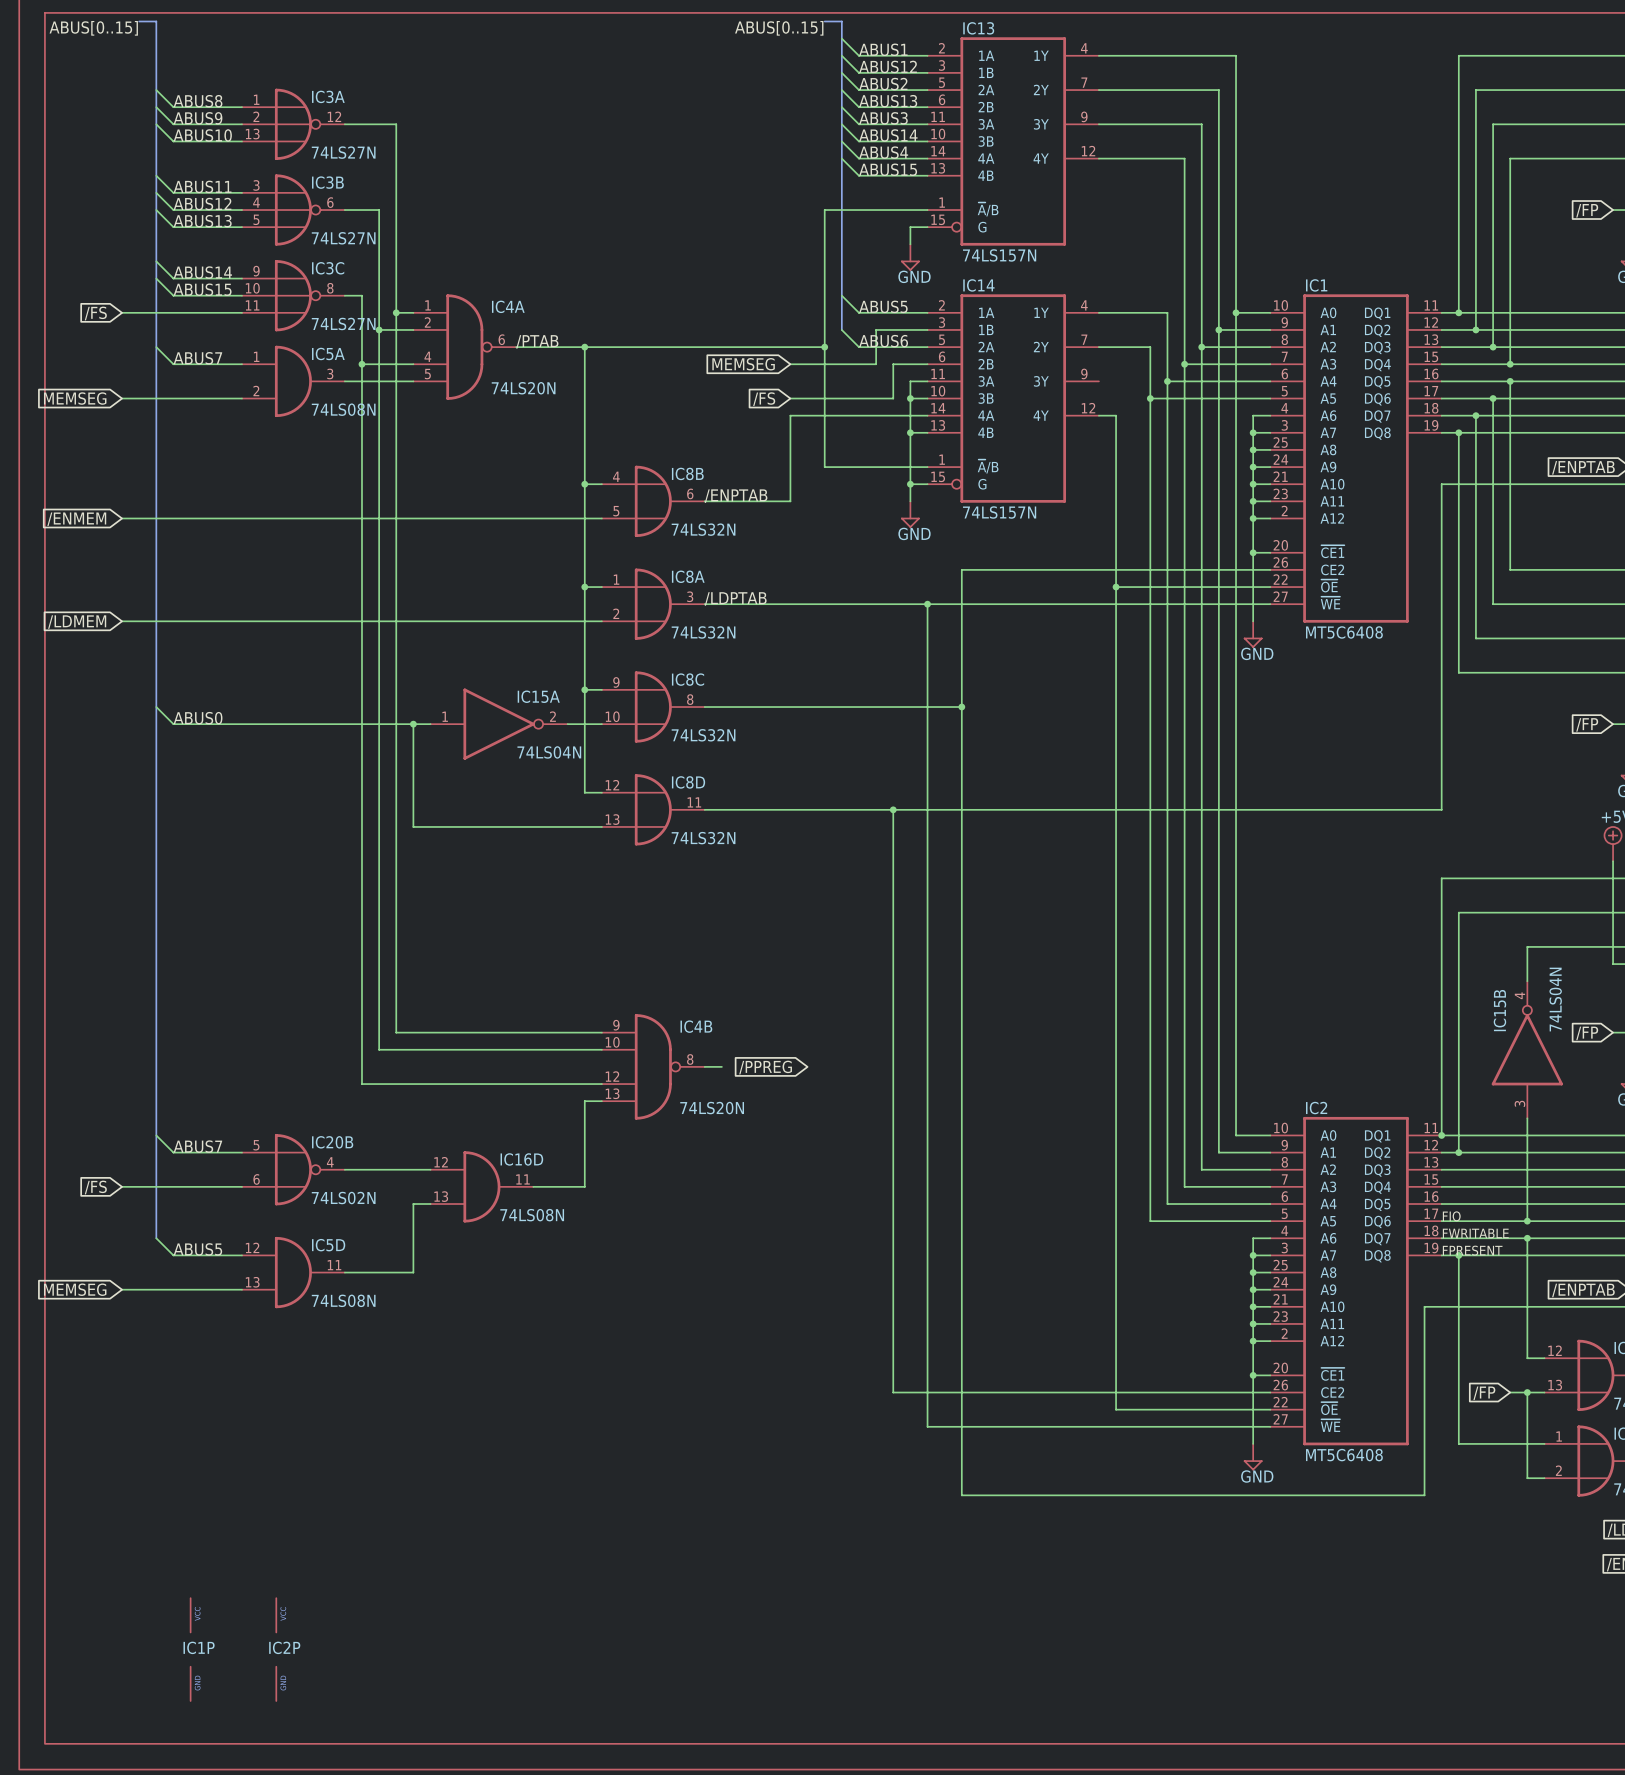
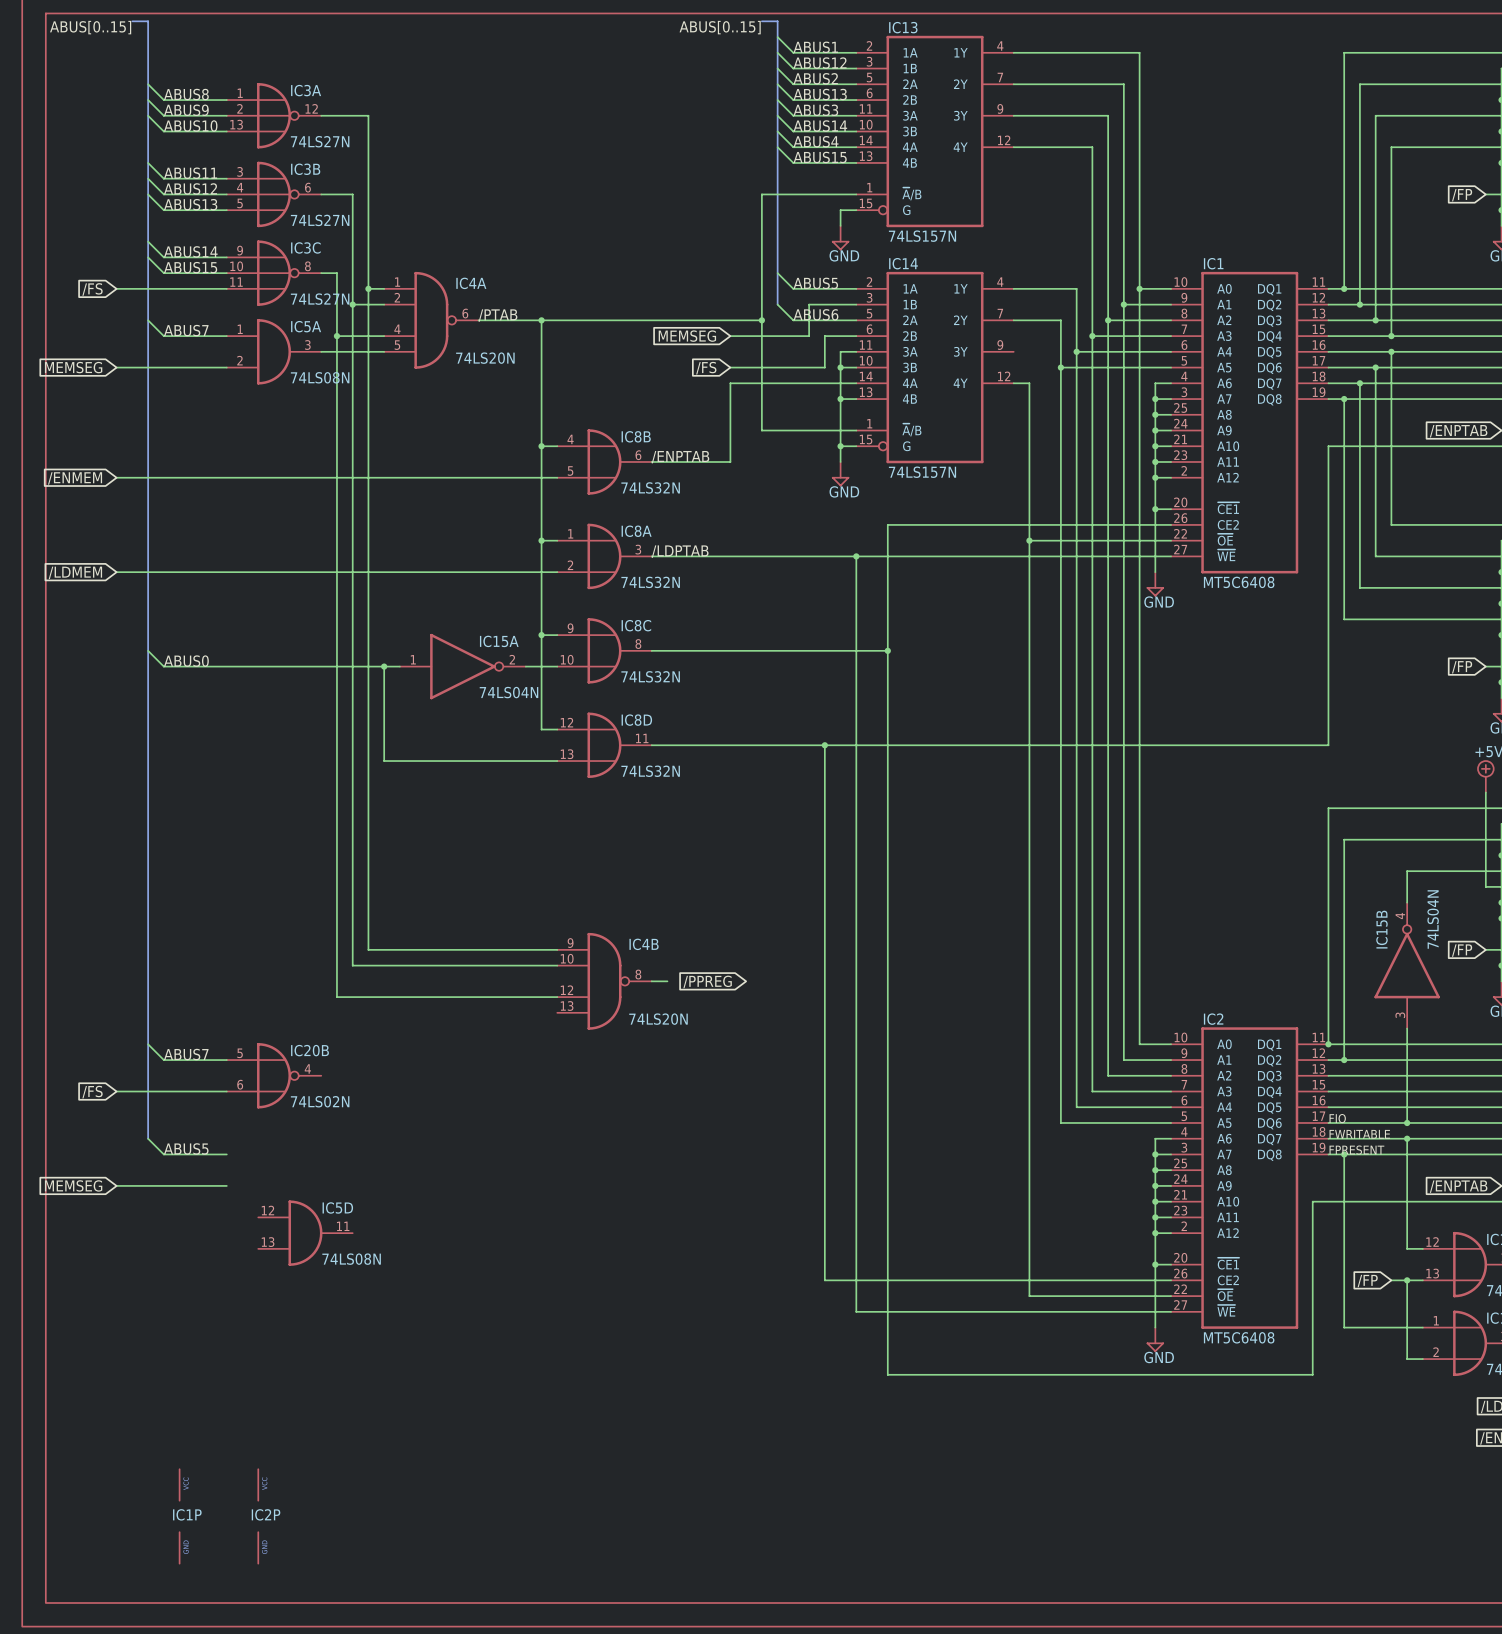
wire: (601, 1101) (584, 1101) (584, 1186) (533, 1186) -> none
wire: (344, 1169) (430, 1169) -> none
IC16D: 74LS08N (481, 1186) -> none
wire: (430, 1204) (413, 1204) (413, 1272) (344, 1272) -> none
IC5D position: (293, 1272) -> (305, 1233)

